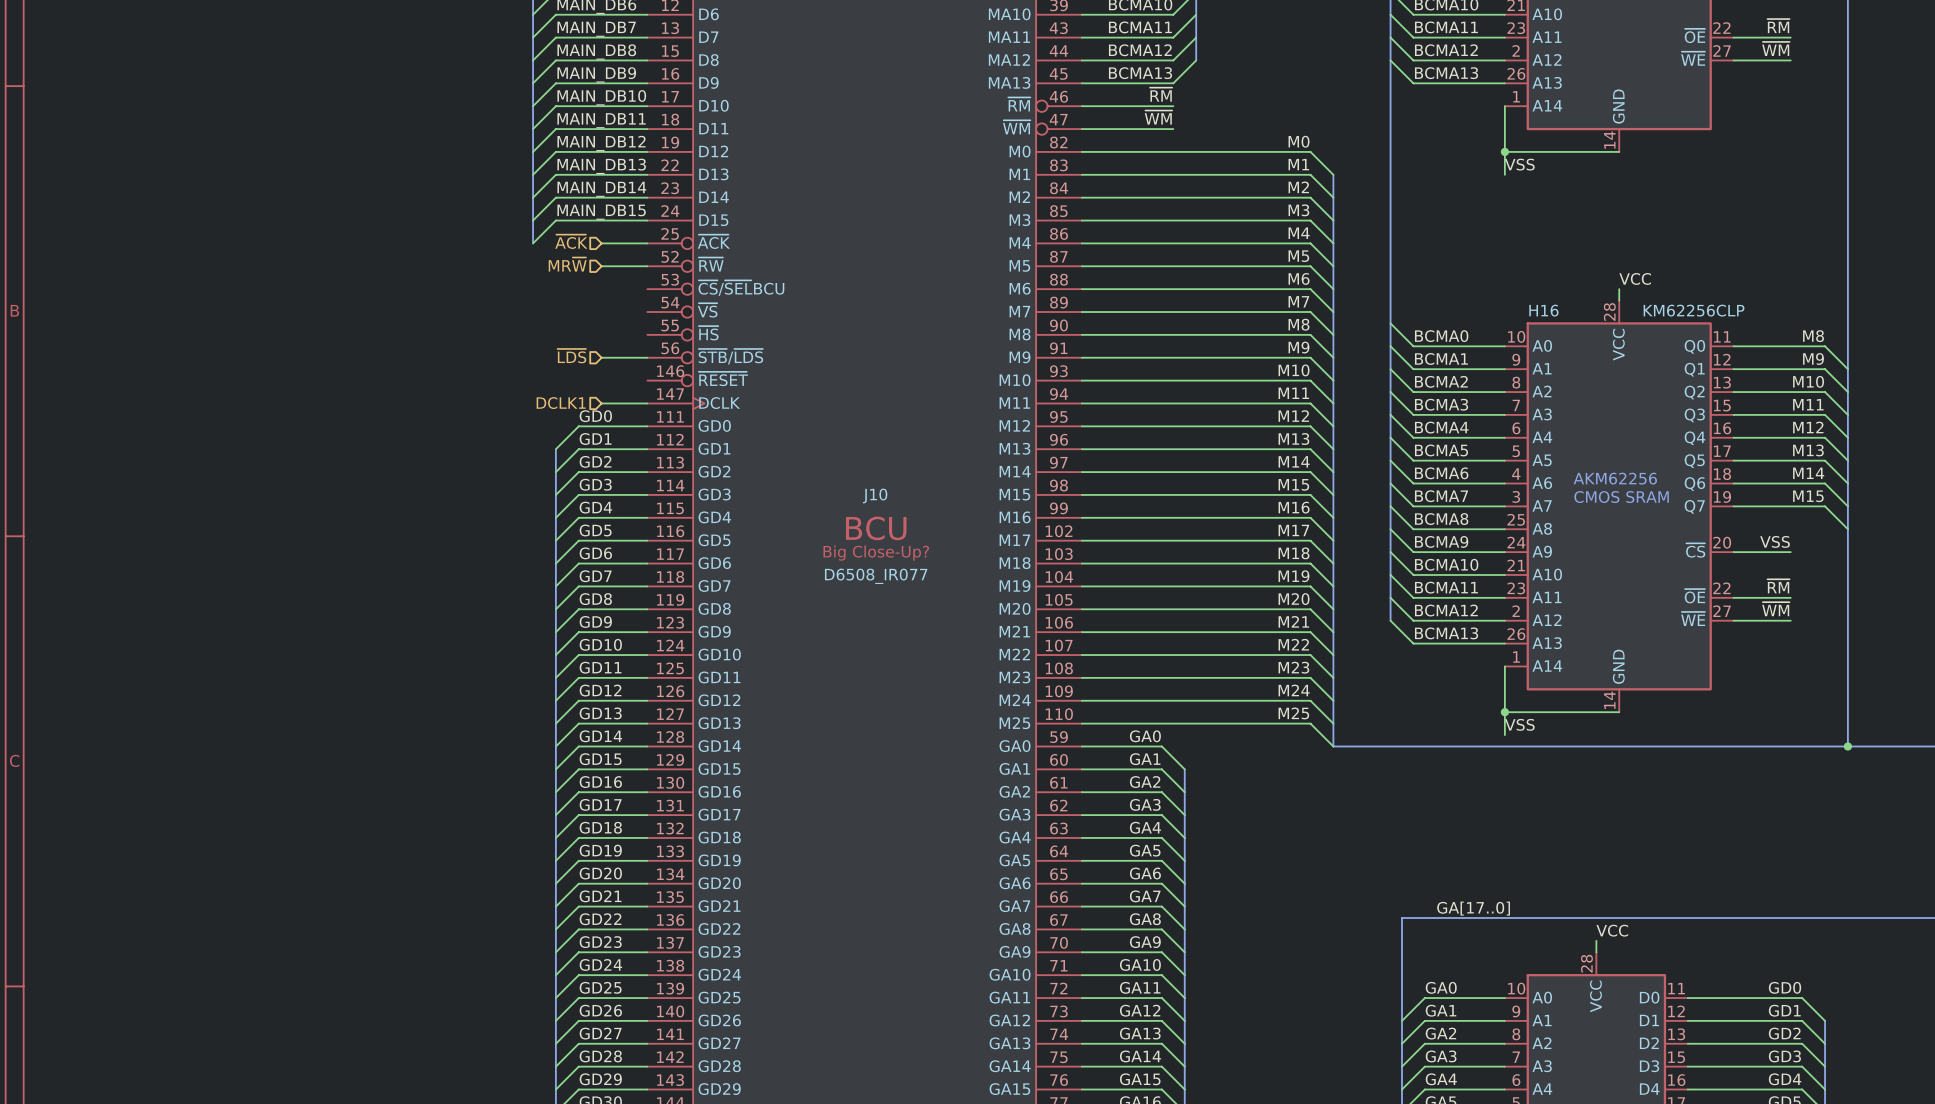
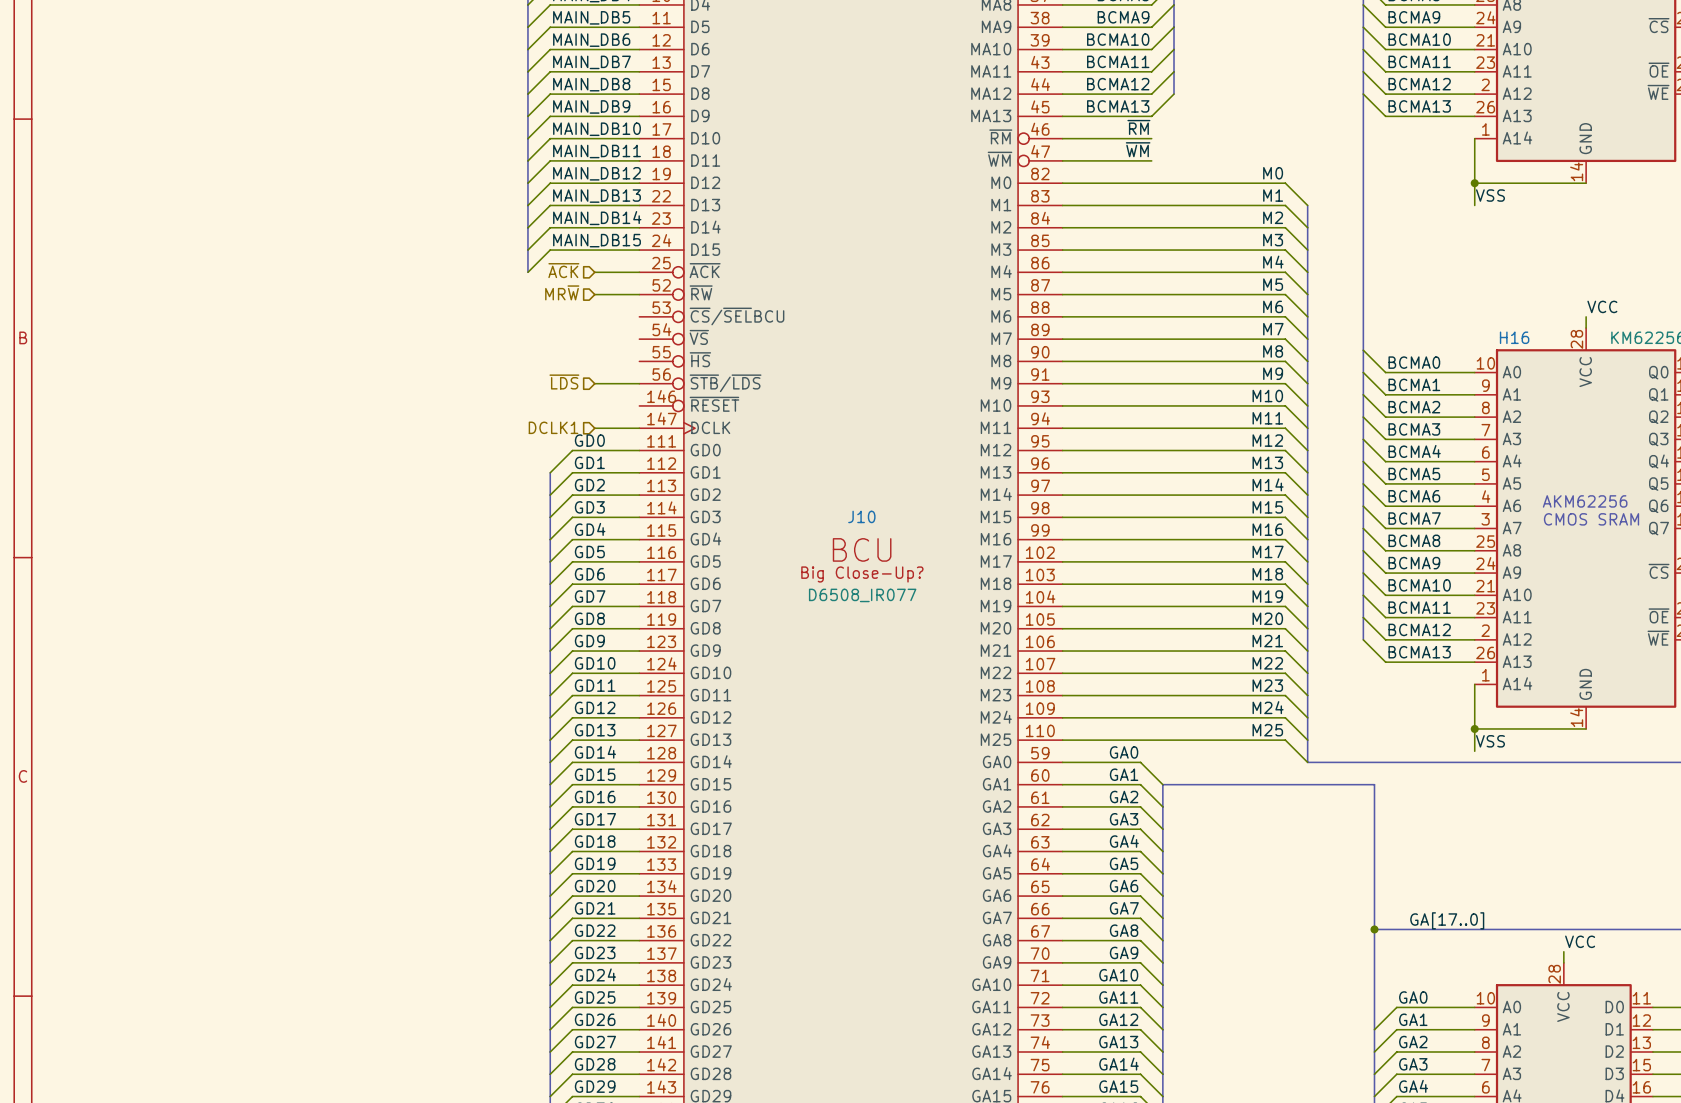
bus: none -> (1162, 784) (1374, 784) (1374, 929)
junction: none -> (1374, 929)

